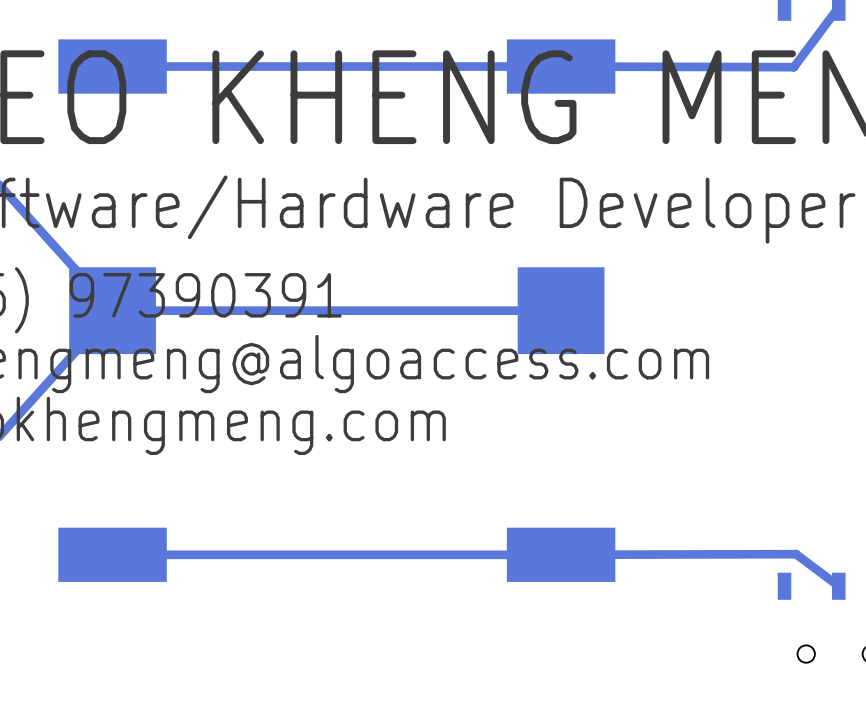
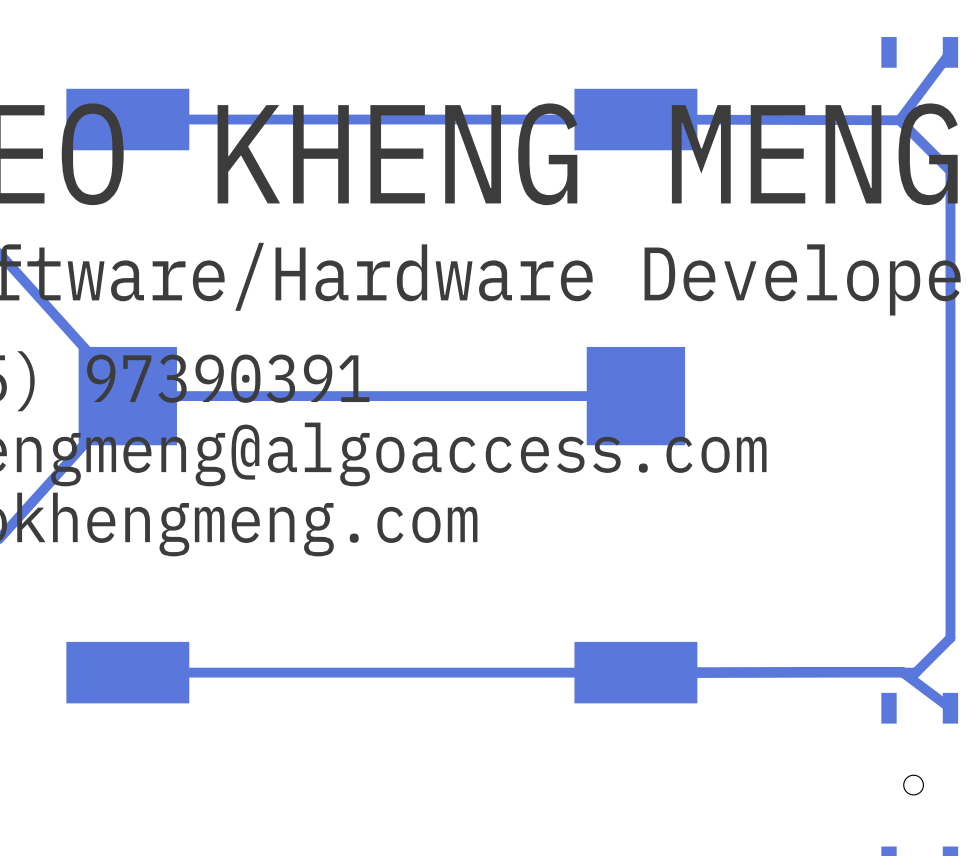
bottom track: none -> (899, 120) (950, 171) (950, 638) (915, 672) (635, 672)

